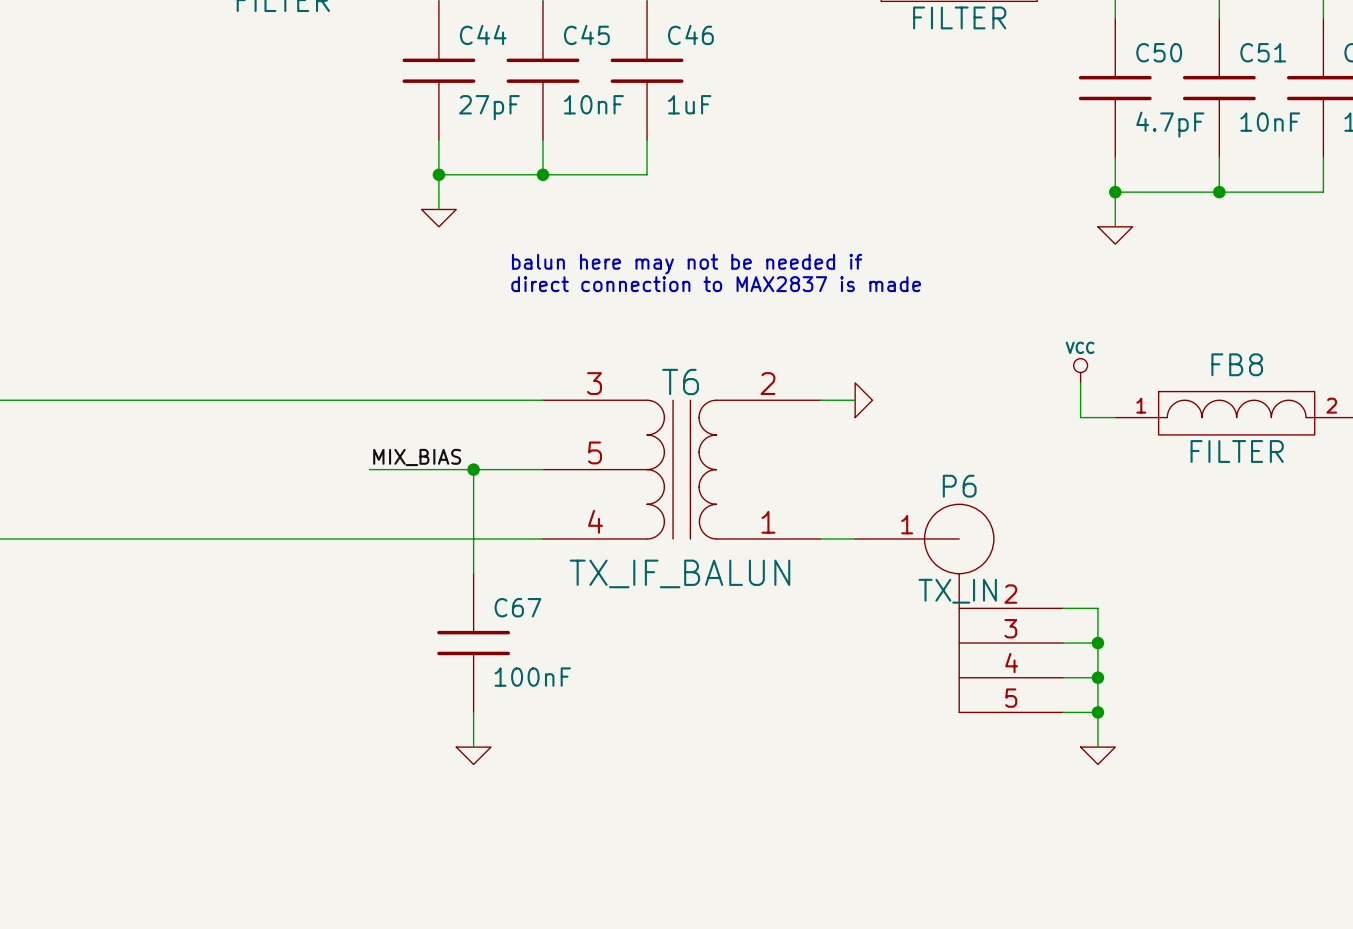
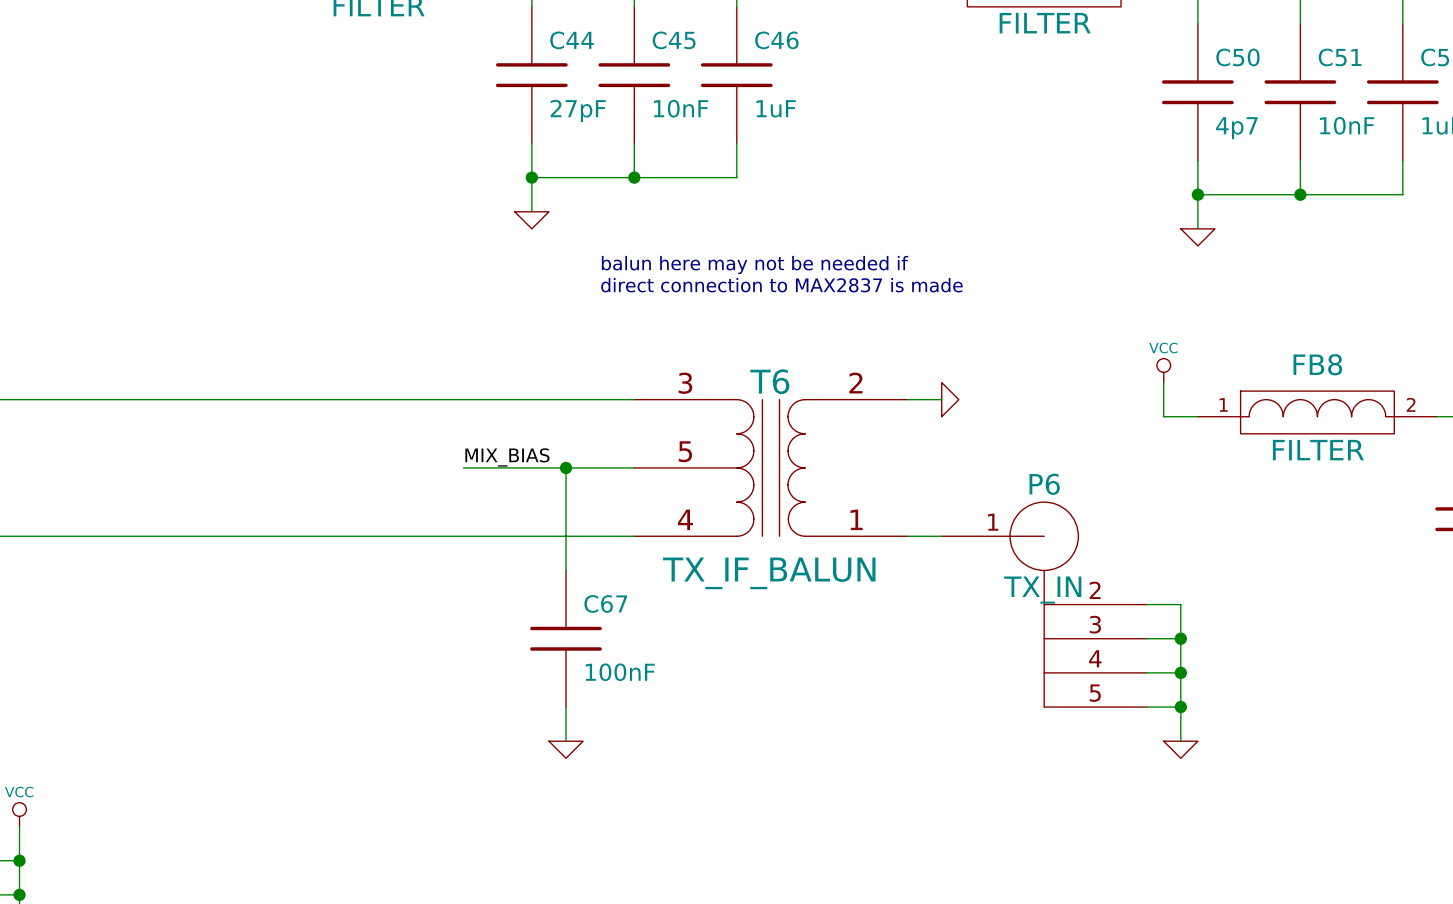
C50 value: 4.7pF (1170, 124) -> 4p7 (1236, 128)

